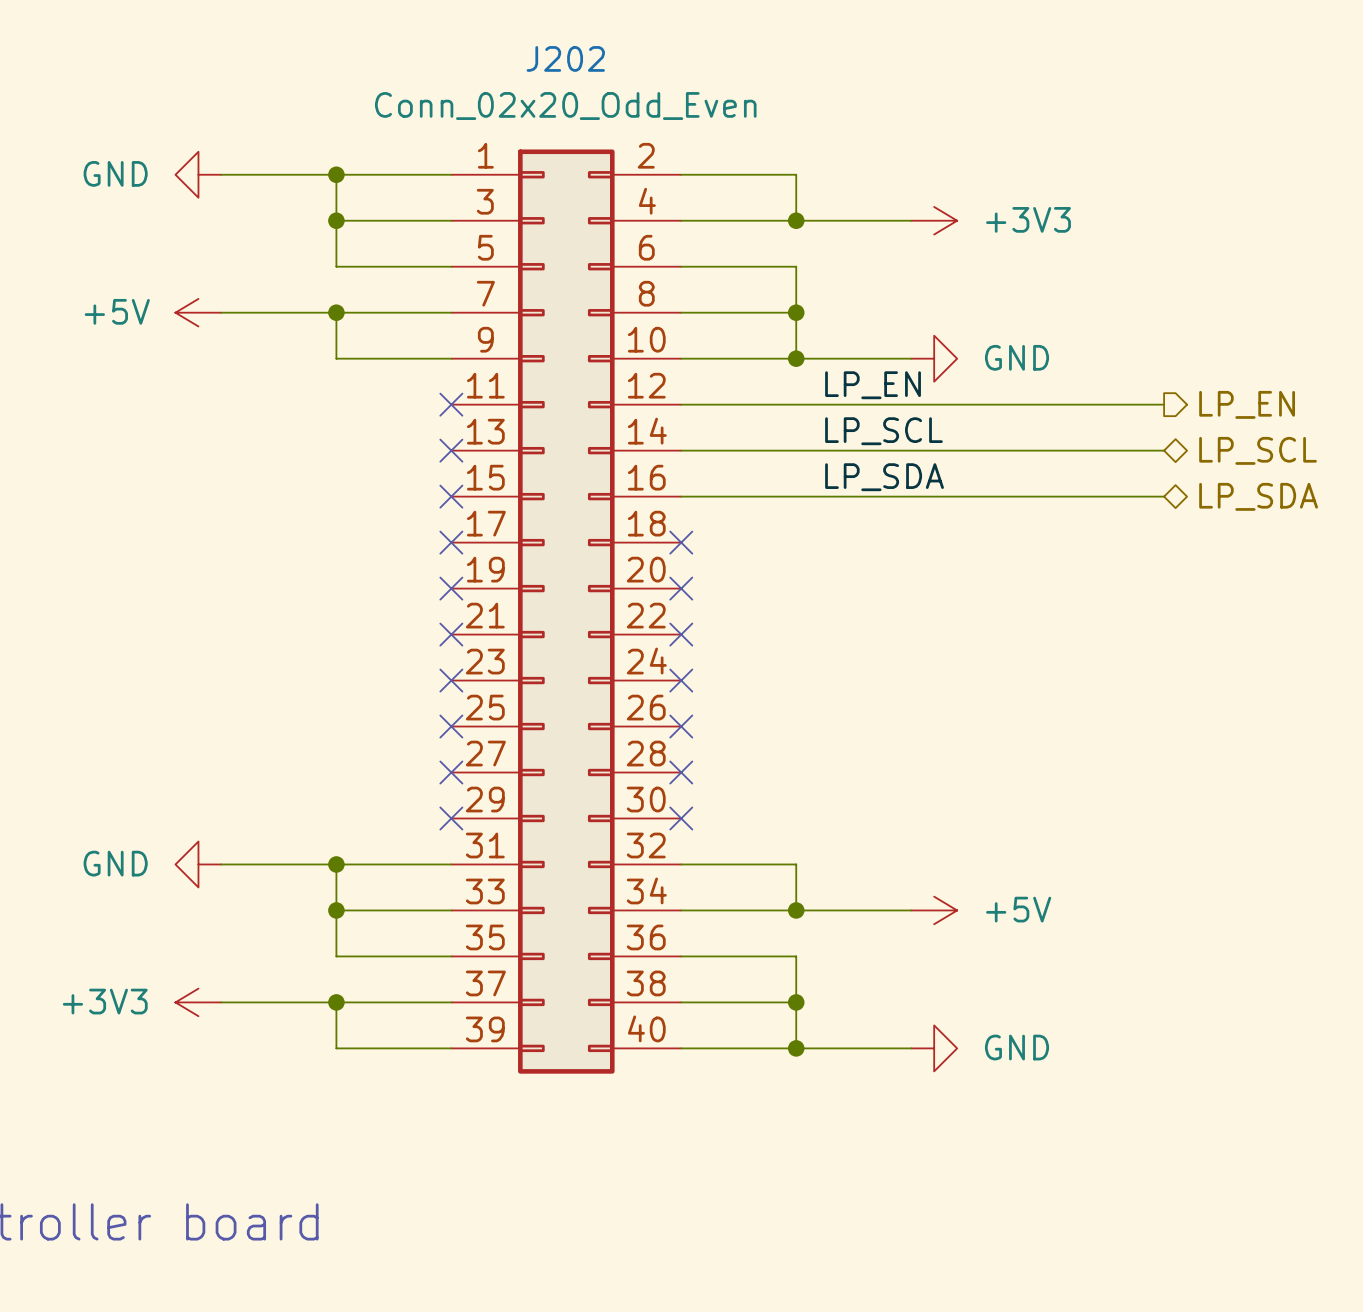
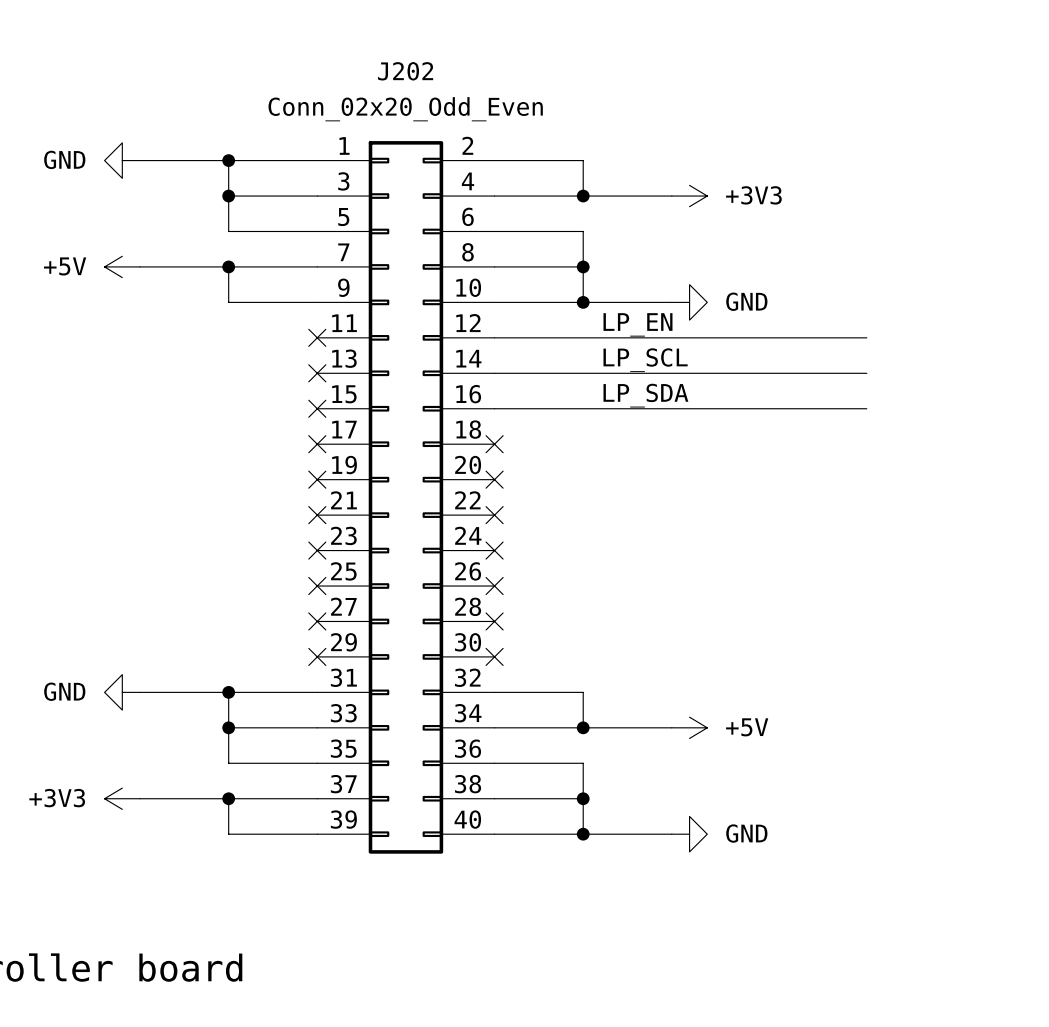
hierarchical label: LP_EN (1247, 404) -> none
hierarchical label: LP_SCL (1258, 450) -> none
hierarchical label: LP_SDA (1258, 496) -> none

